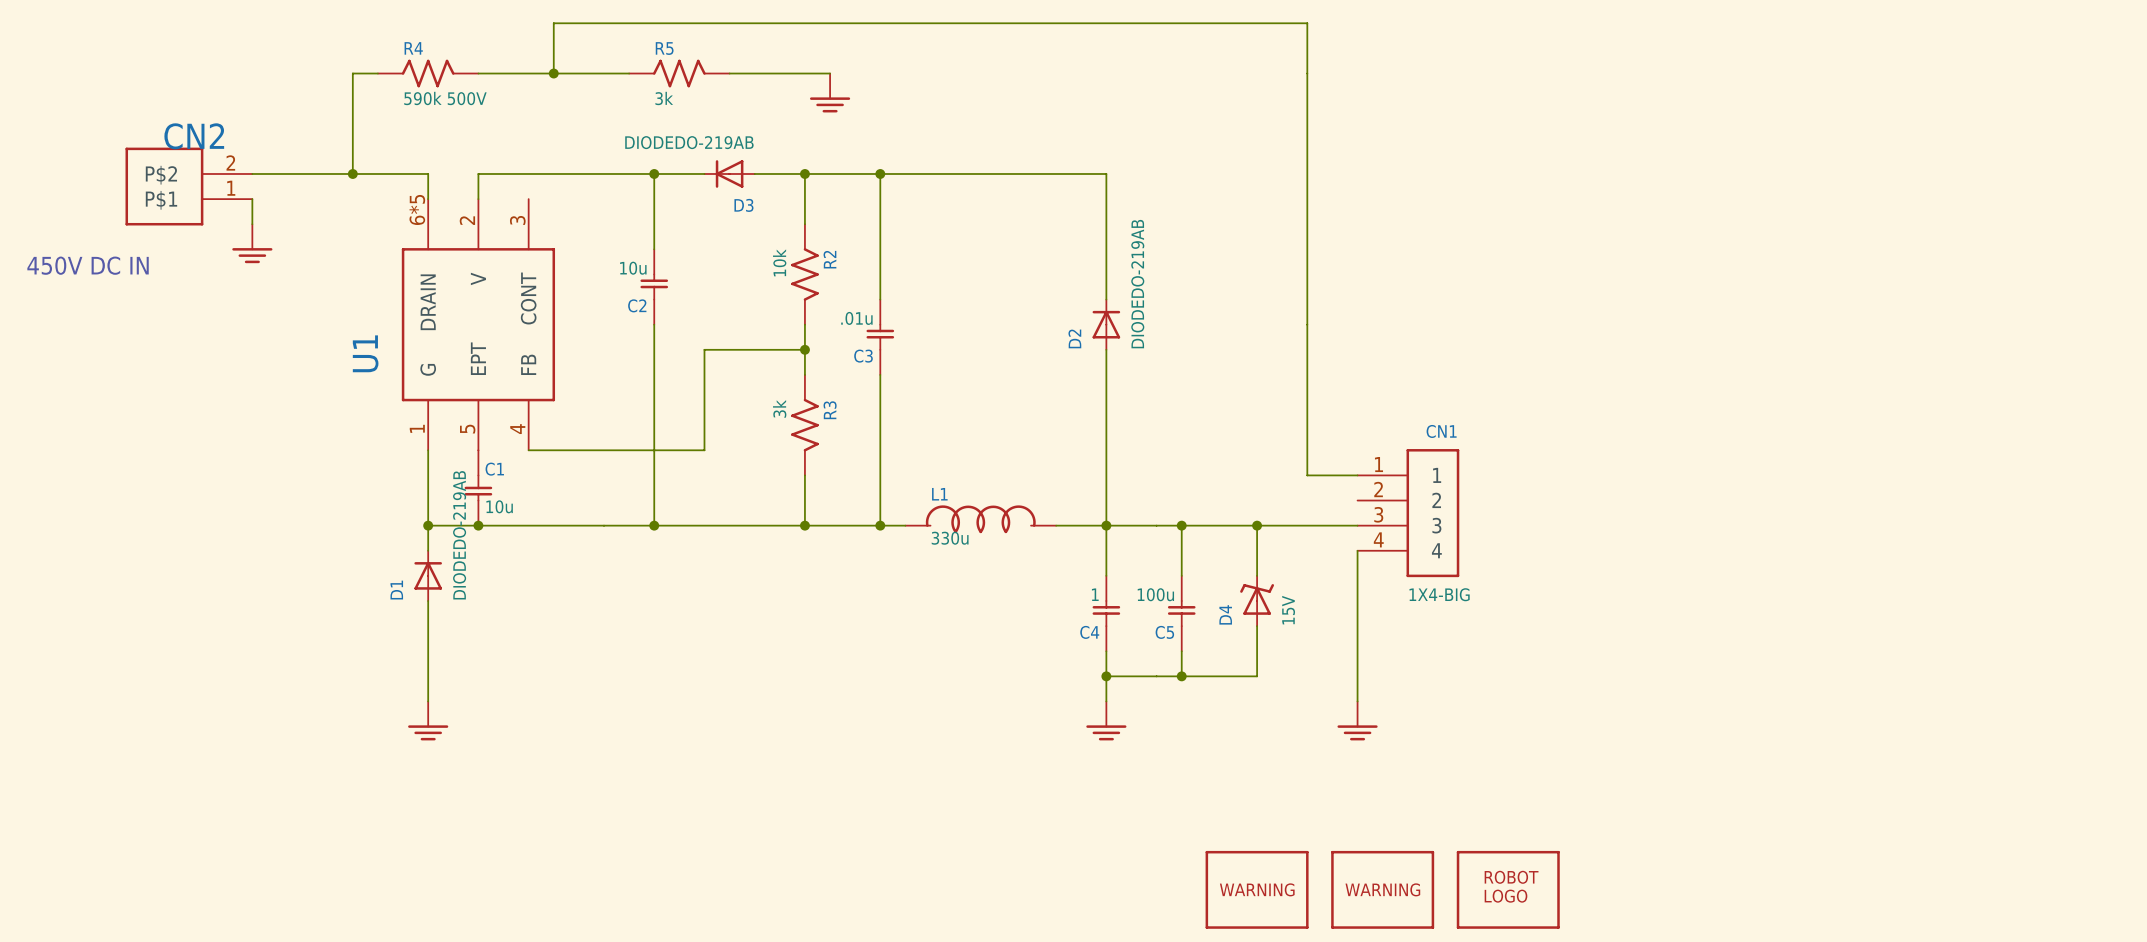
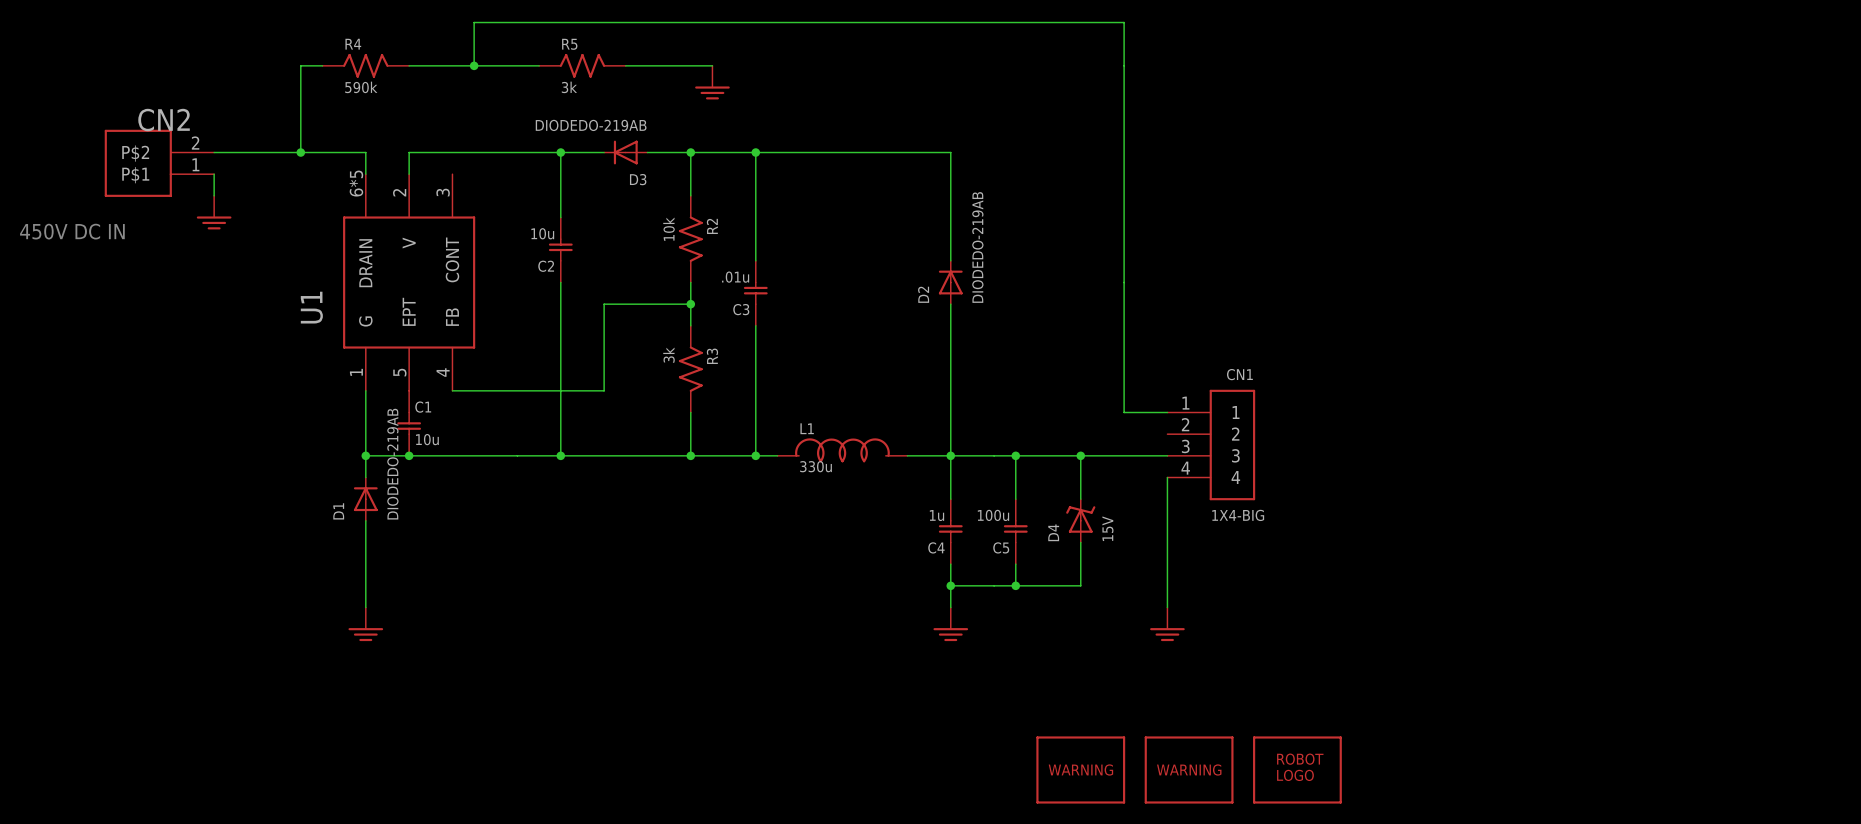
R4 value: 590k 500V (445, 98) -> 590k (361, 87)
C4 value: 1 (1095, 594) -> 1u (936, 515)

